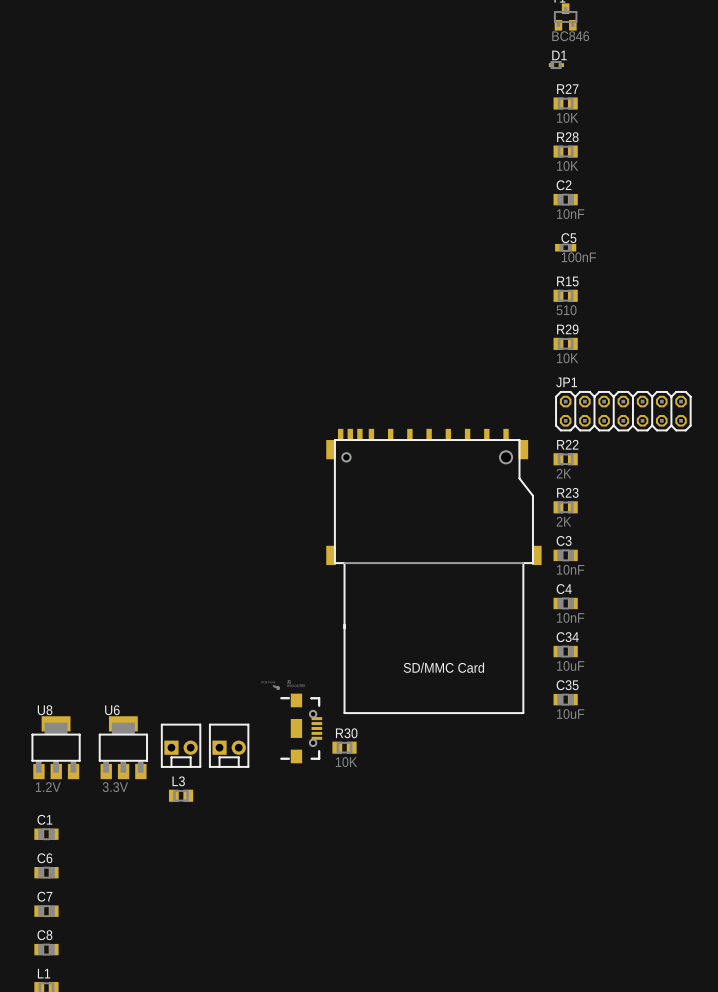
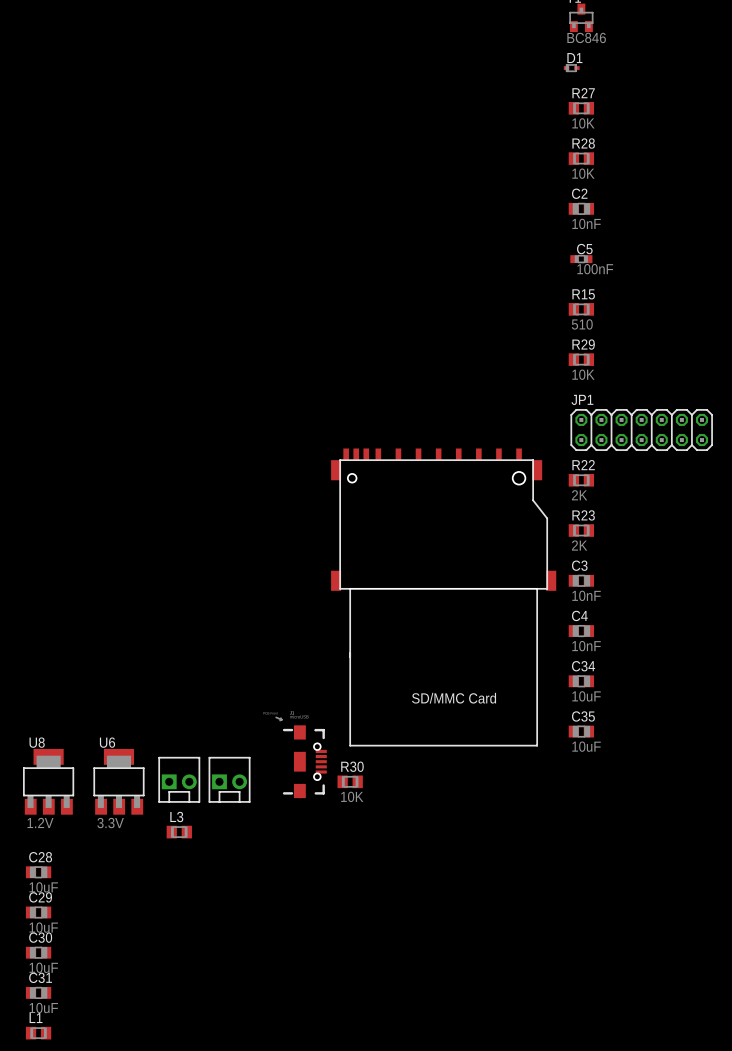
C1 name: C1 (44, 819) -> C28 (40, 857)
C1 value: none -> 10uF (43, 887)
C6 name: C6 (44, 858) -> C29 (40, 897)
C6 value: none -> 10uF (43, 927)
C7 name: C7 (44, 896) -> C30 (40, 937)
C7 value: none -> 10uF (43, 967)
C8 name: C8 (44, 935) -> C31 (40, 977)
C8 value: none -> 10uF (43, 1008)

